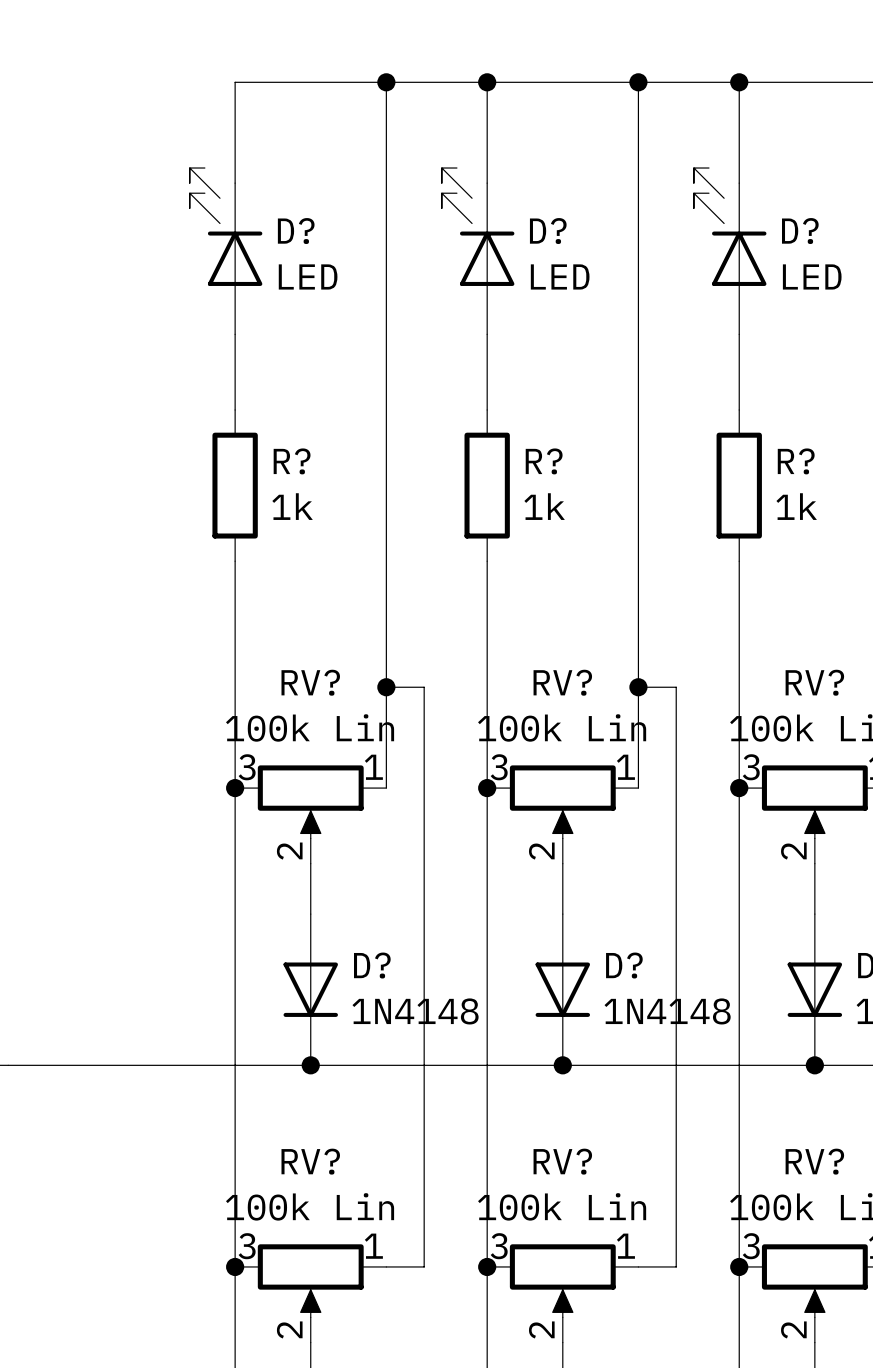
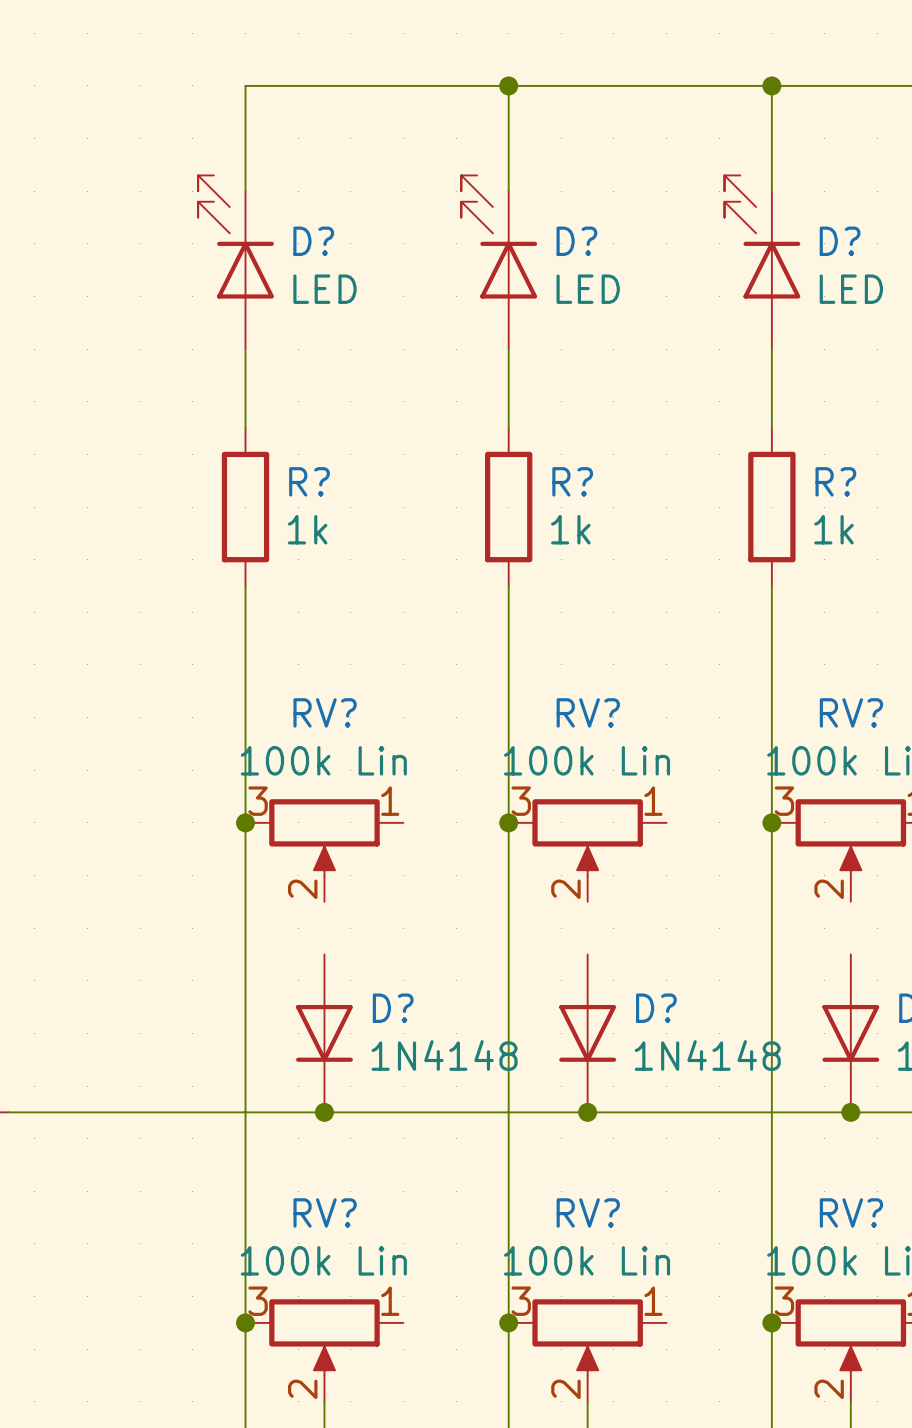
wire: (386, 82) (386, 788) -> none
junction: (386, 82) -> none
wire: (638, 82) (638, 788) -> none
junction: (638, 82) -> none
wire: (386, 687) (424, 687) (424, 1266) (386, 1266) -> none
junction: (386, 687) -> none
wire: (638, 687) (676, 687) (676, 1266) (638, 1266) -> none
junction: (638, 687) -> none
wire: (310, 863) (310, 914) -> none
wire: (562, 863) (562, 914) -> none
wire: (814, 863) (814, 914) -> none

